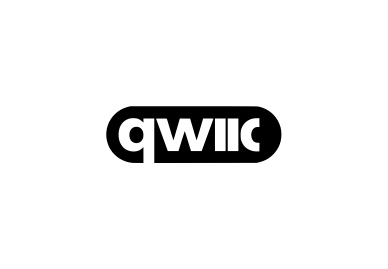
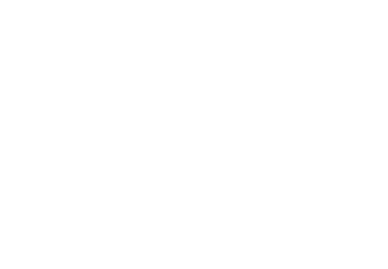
drawing: [106, 106, 282, 164] -> none

